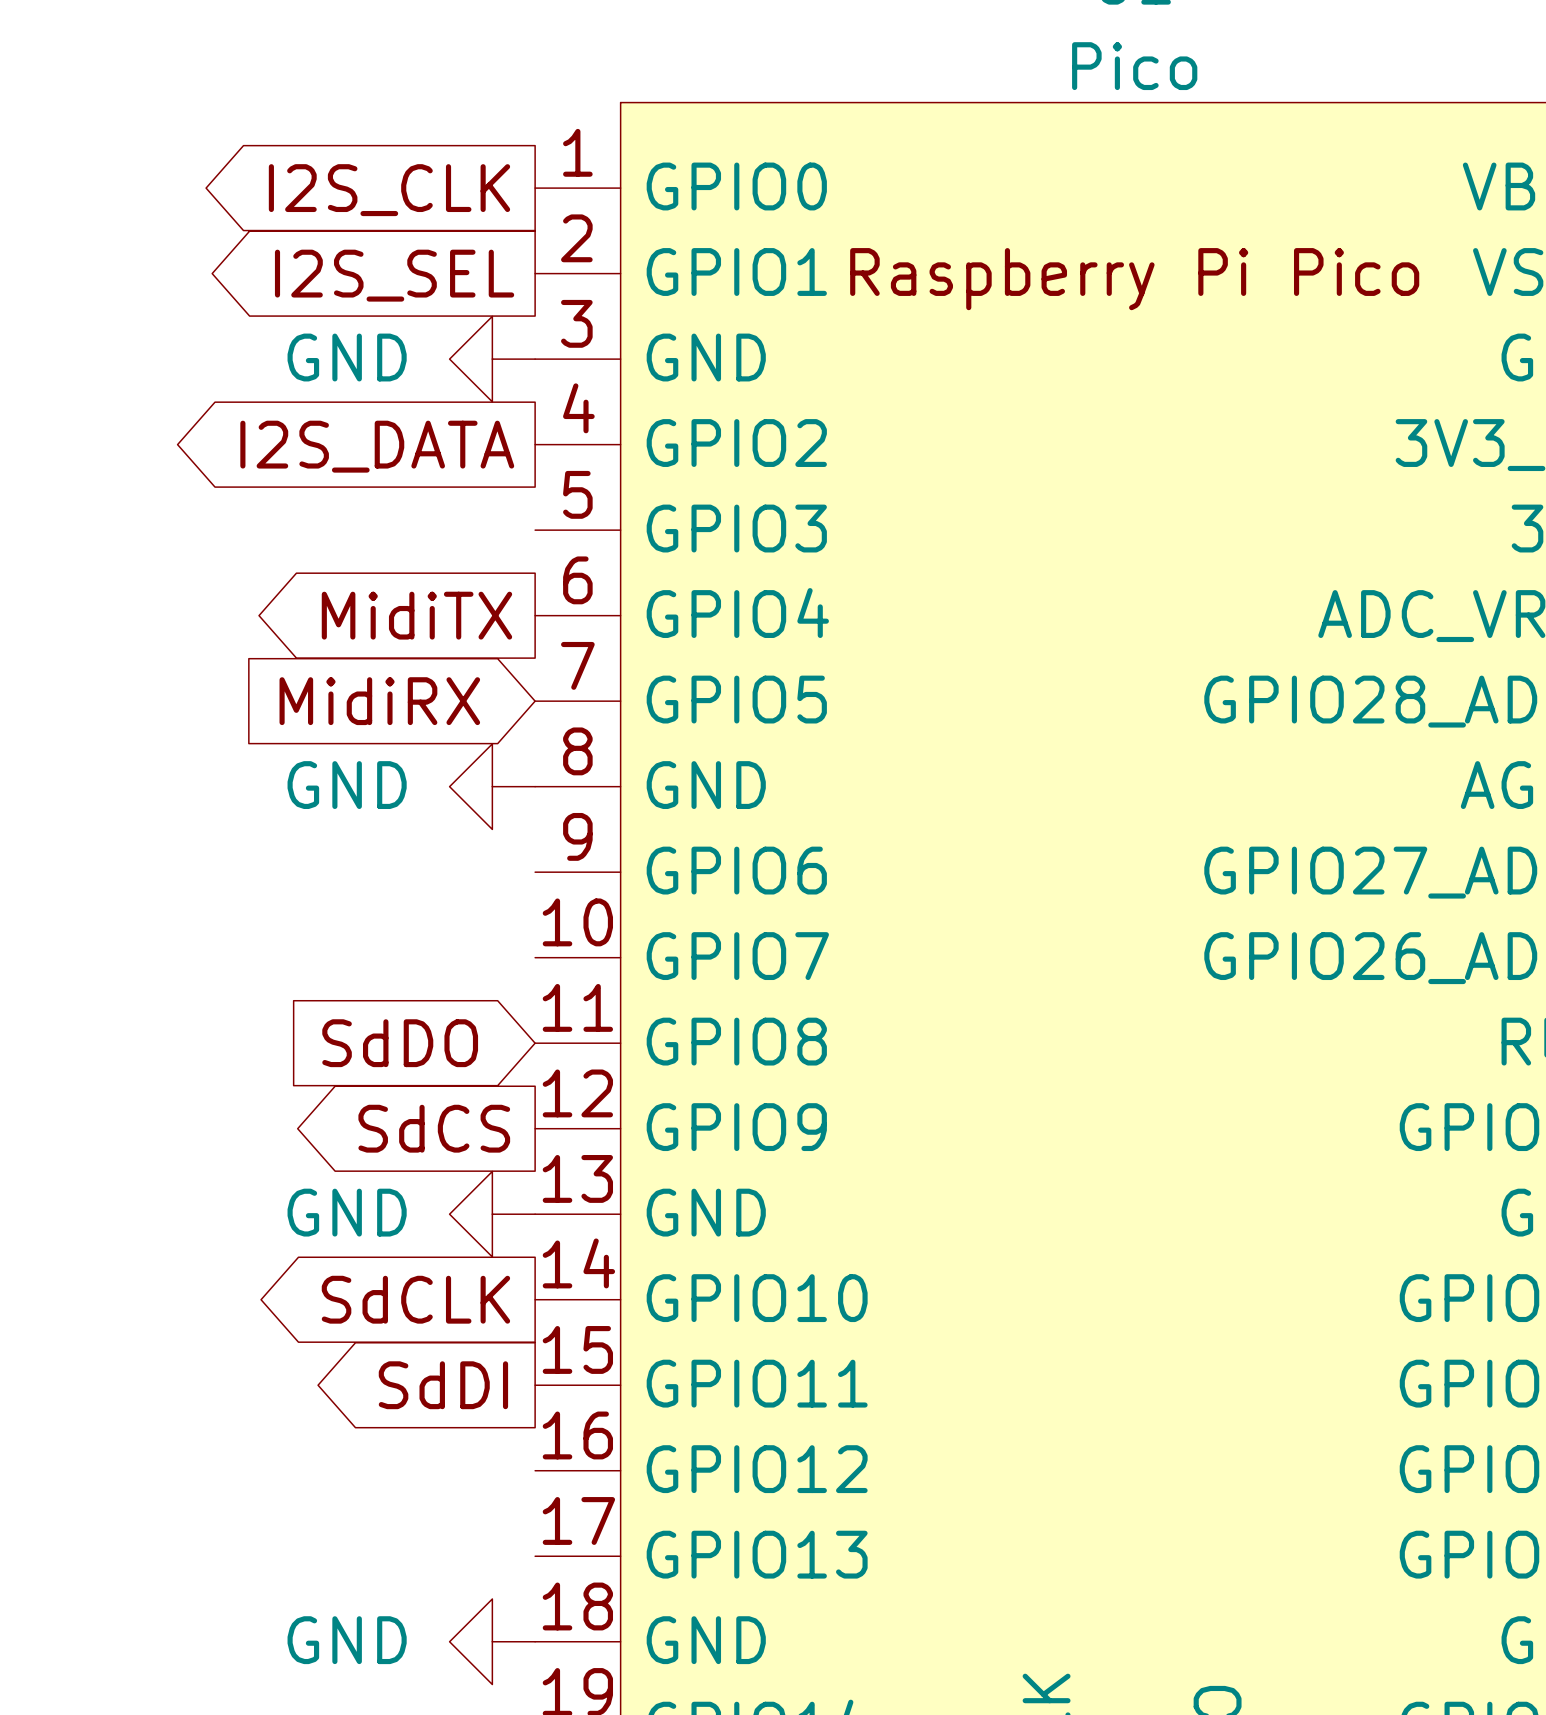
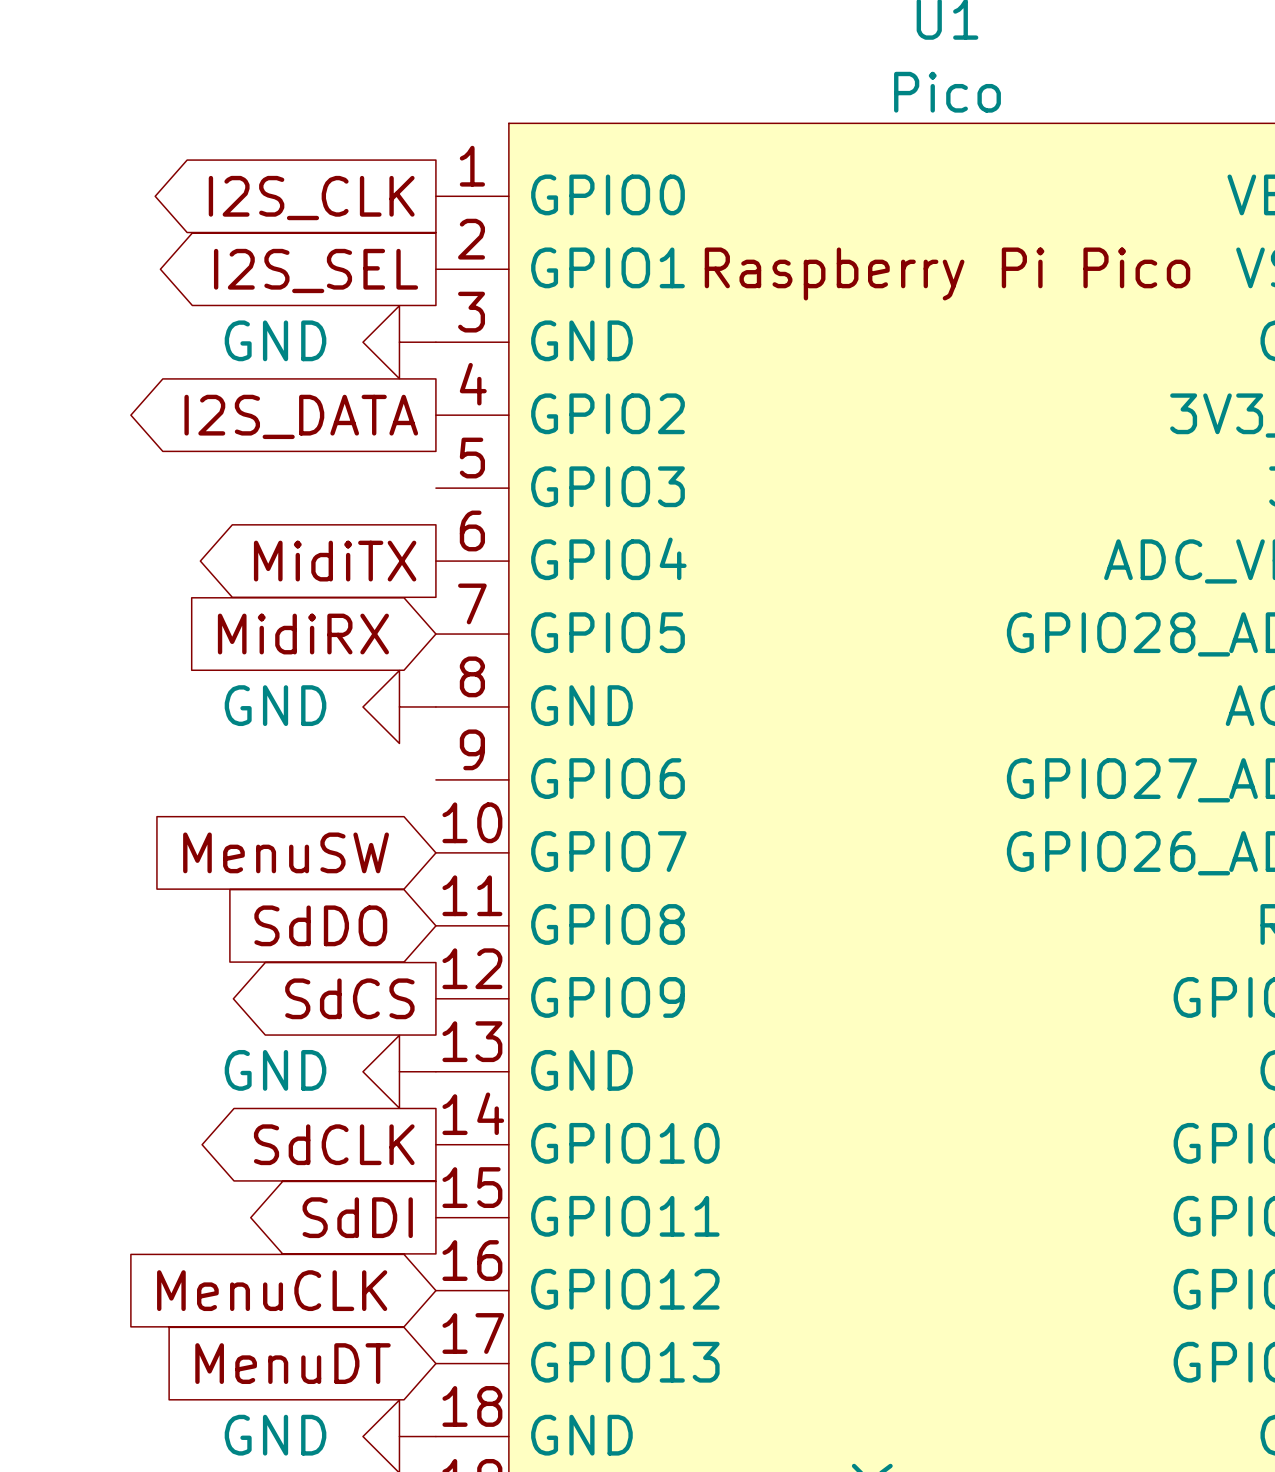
global label: none -> MenuSW (286, 852)
global label: none -> MenuCLK (272, 1290)
global label: none -> MenuDT (293, 1363)

